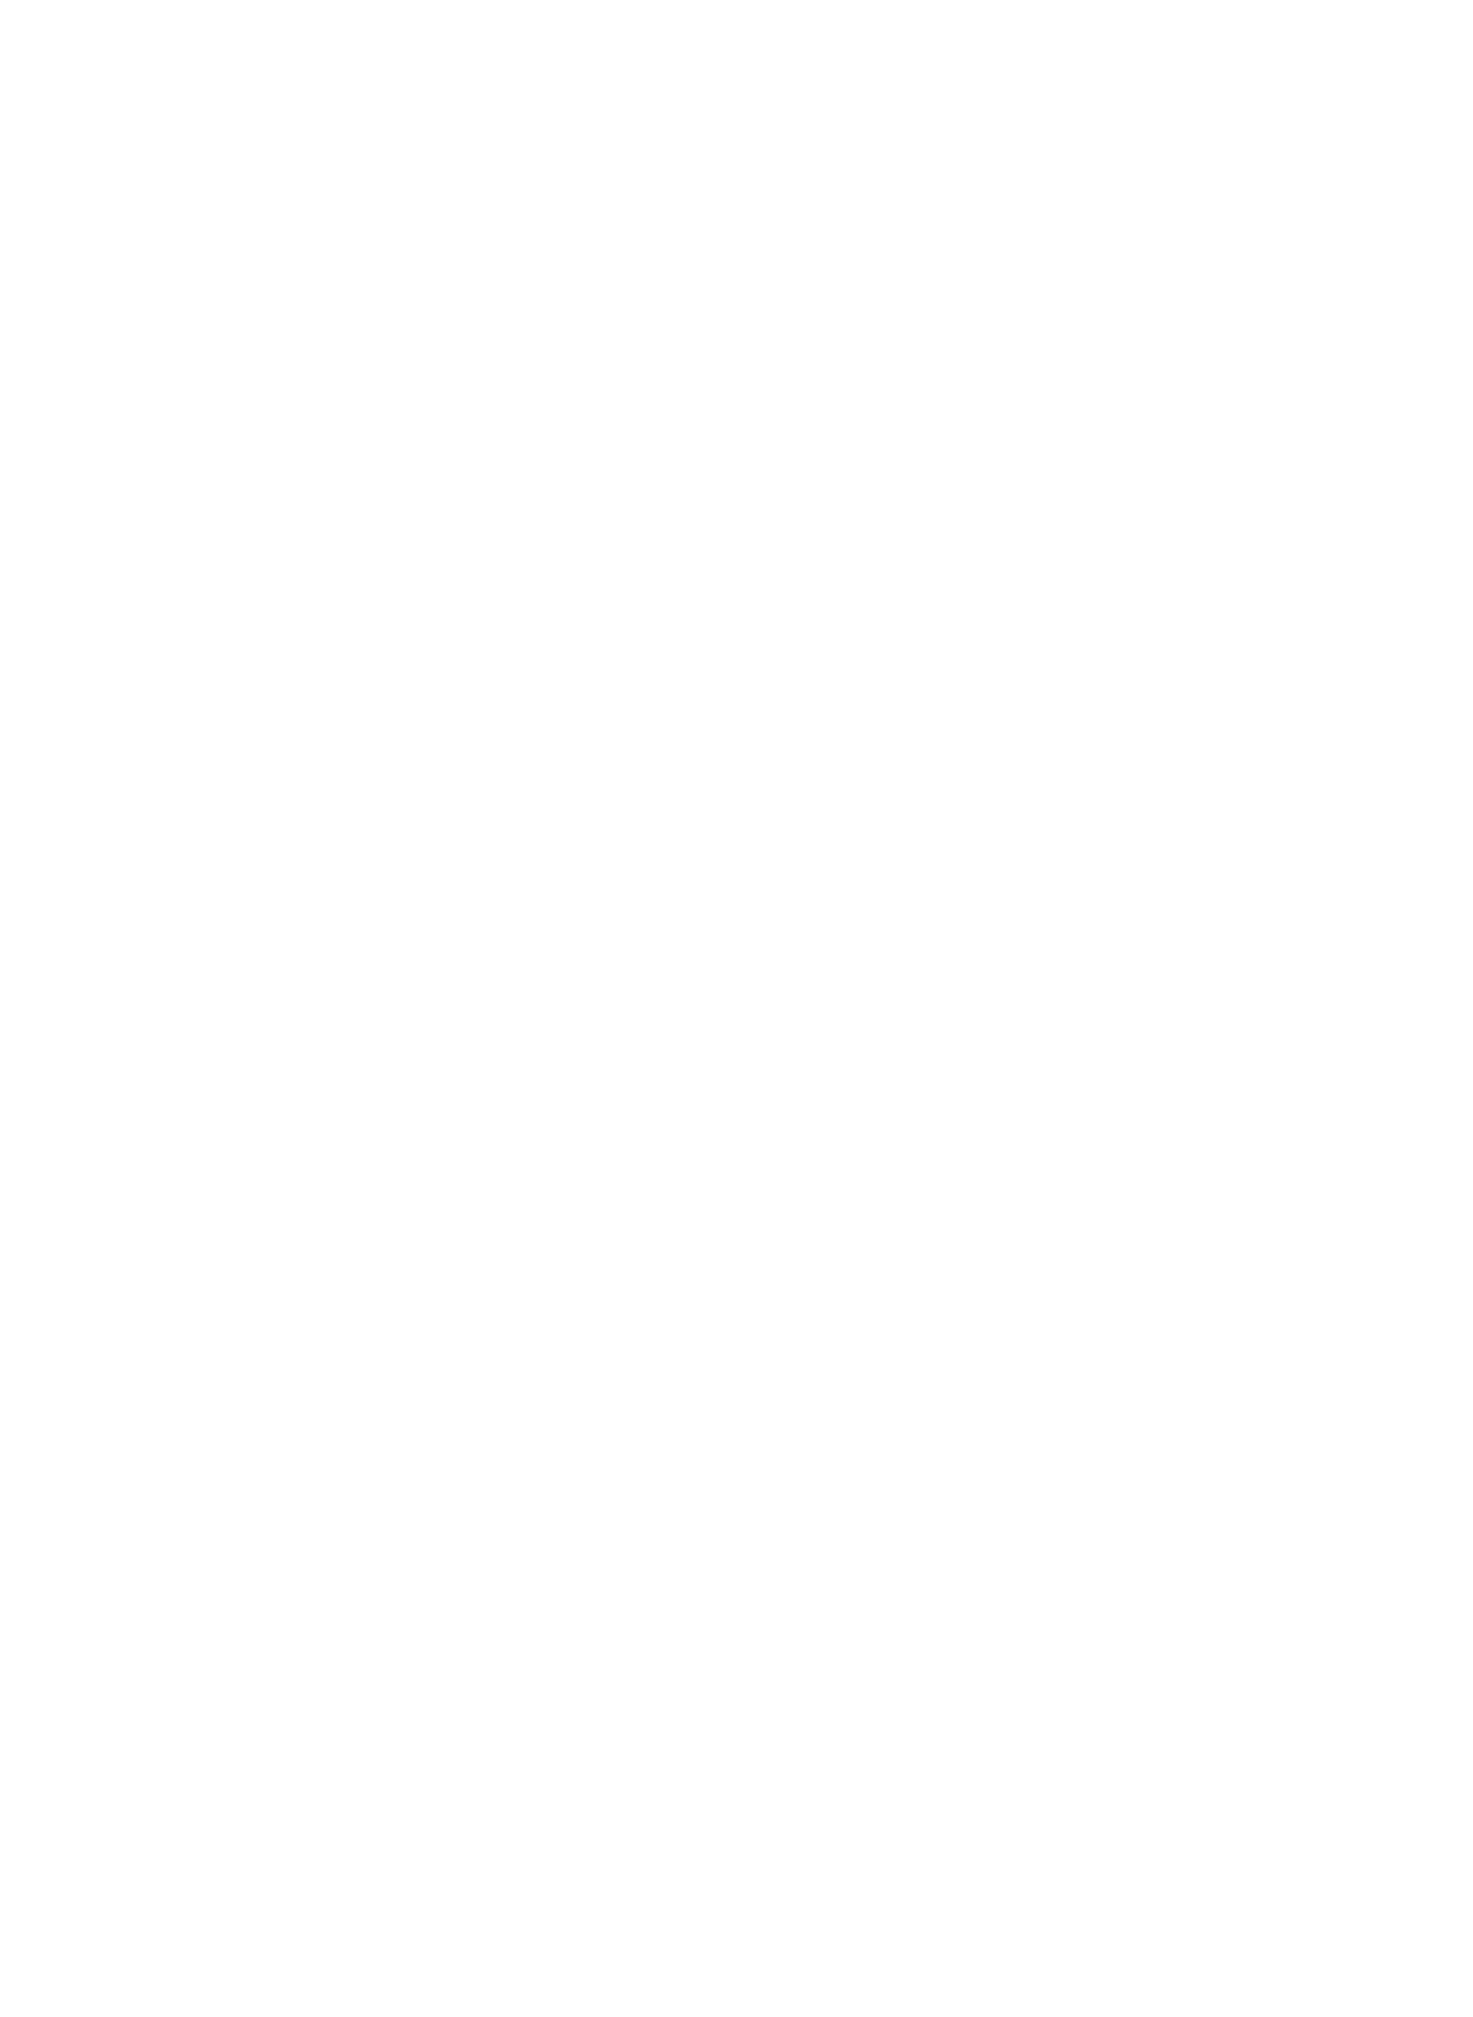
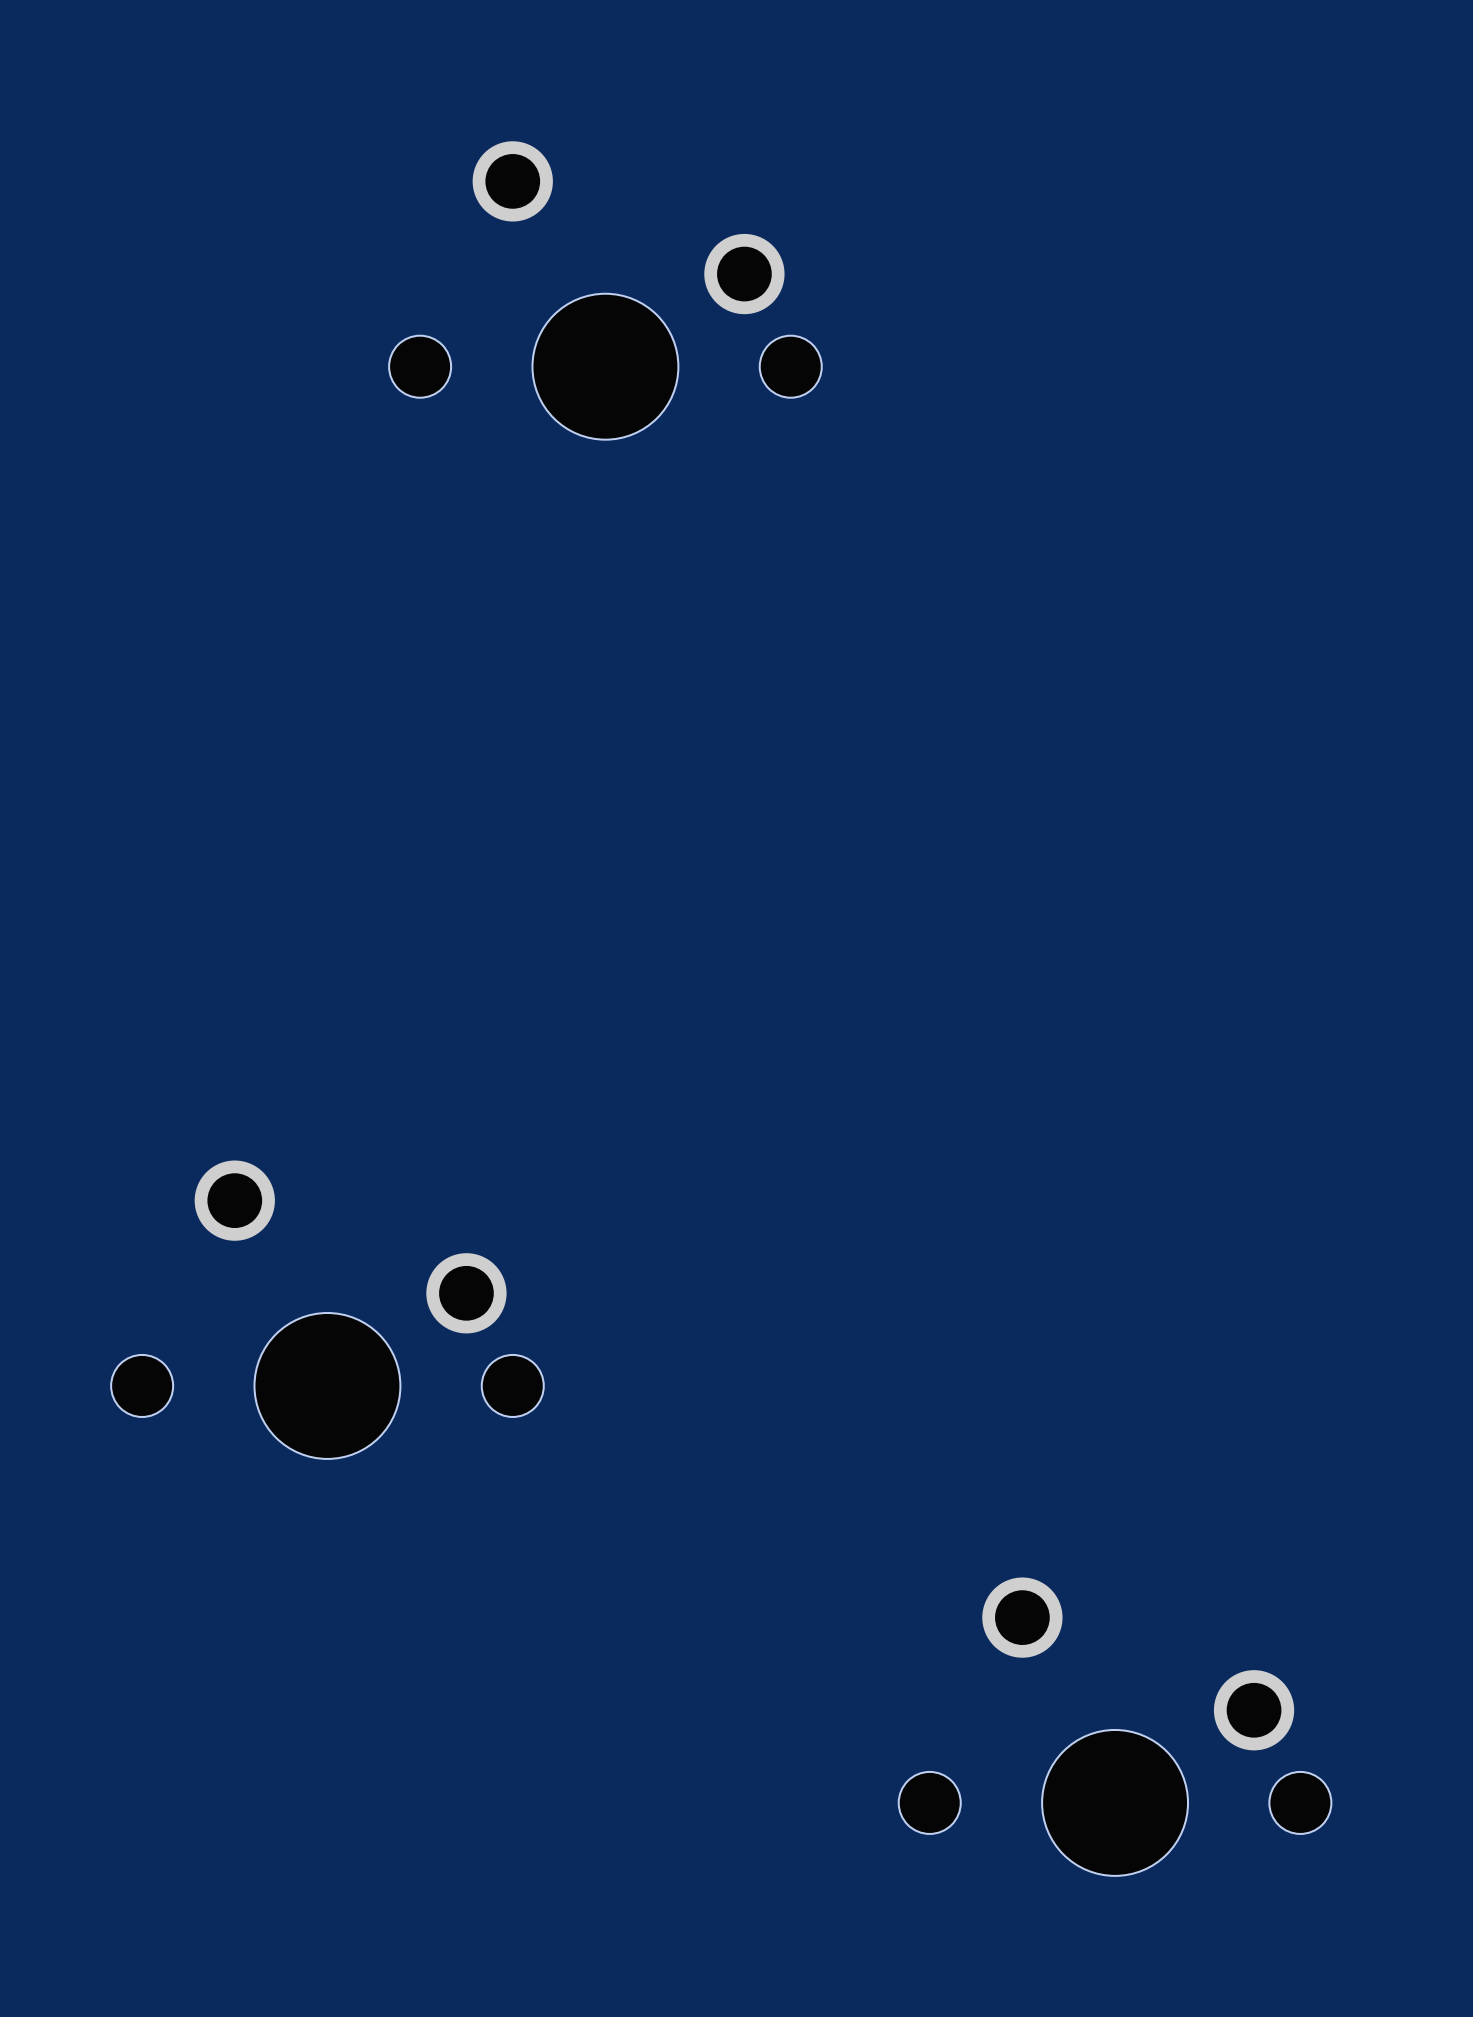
part: none -> (605, 290)
part: none -> (327, 1309)
part: none -> (1115, 1726)

